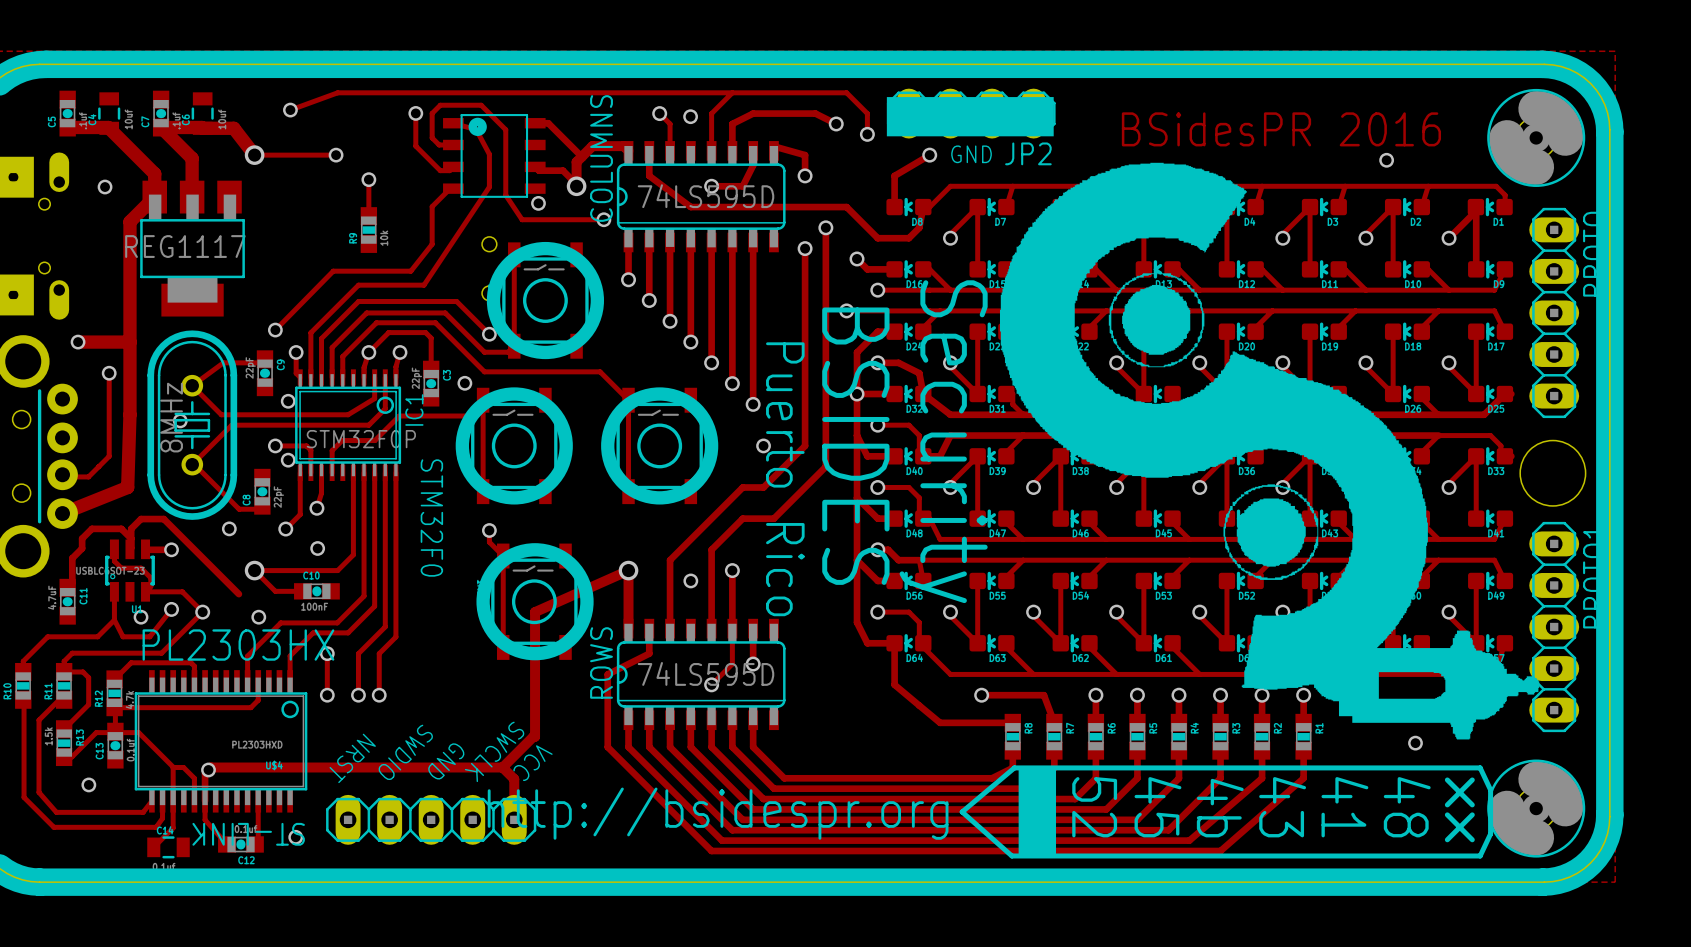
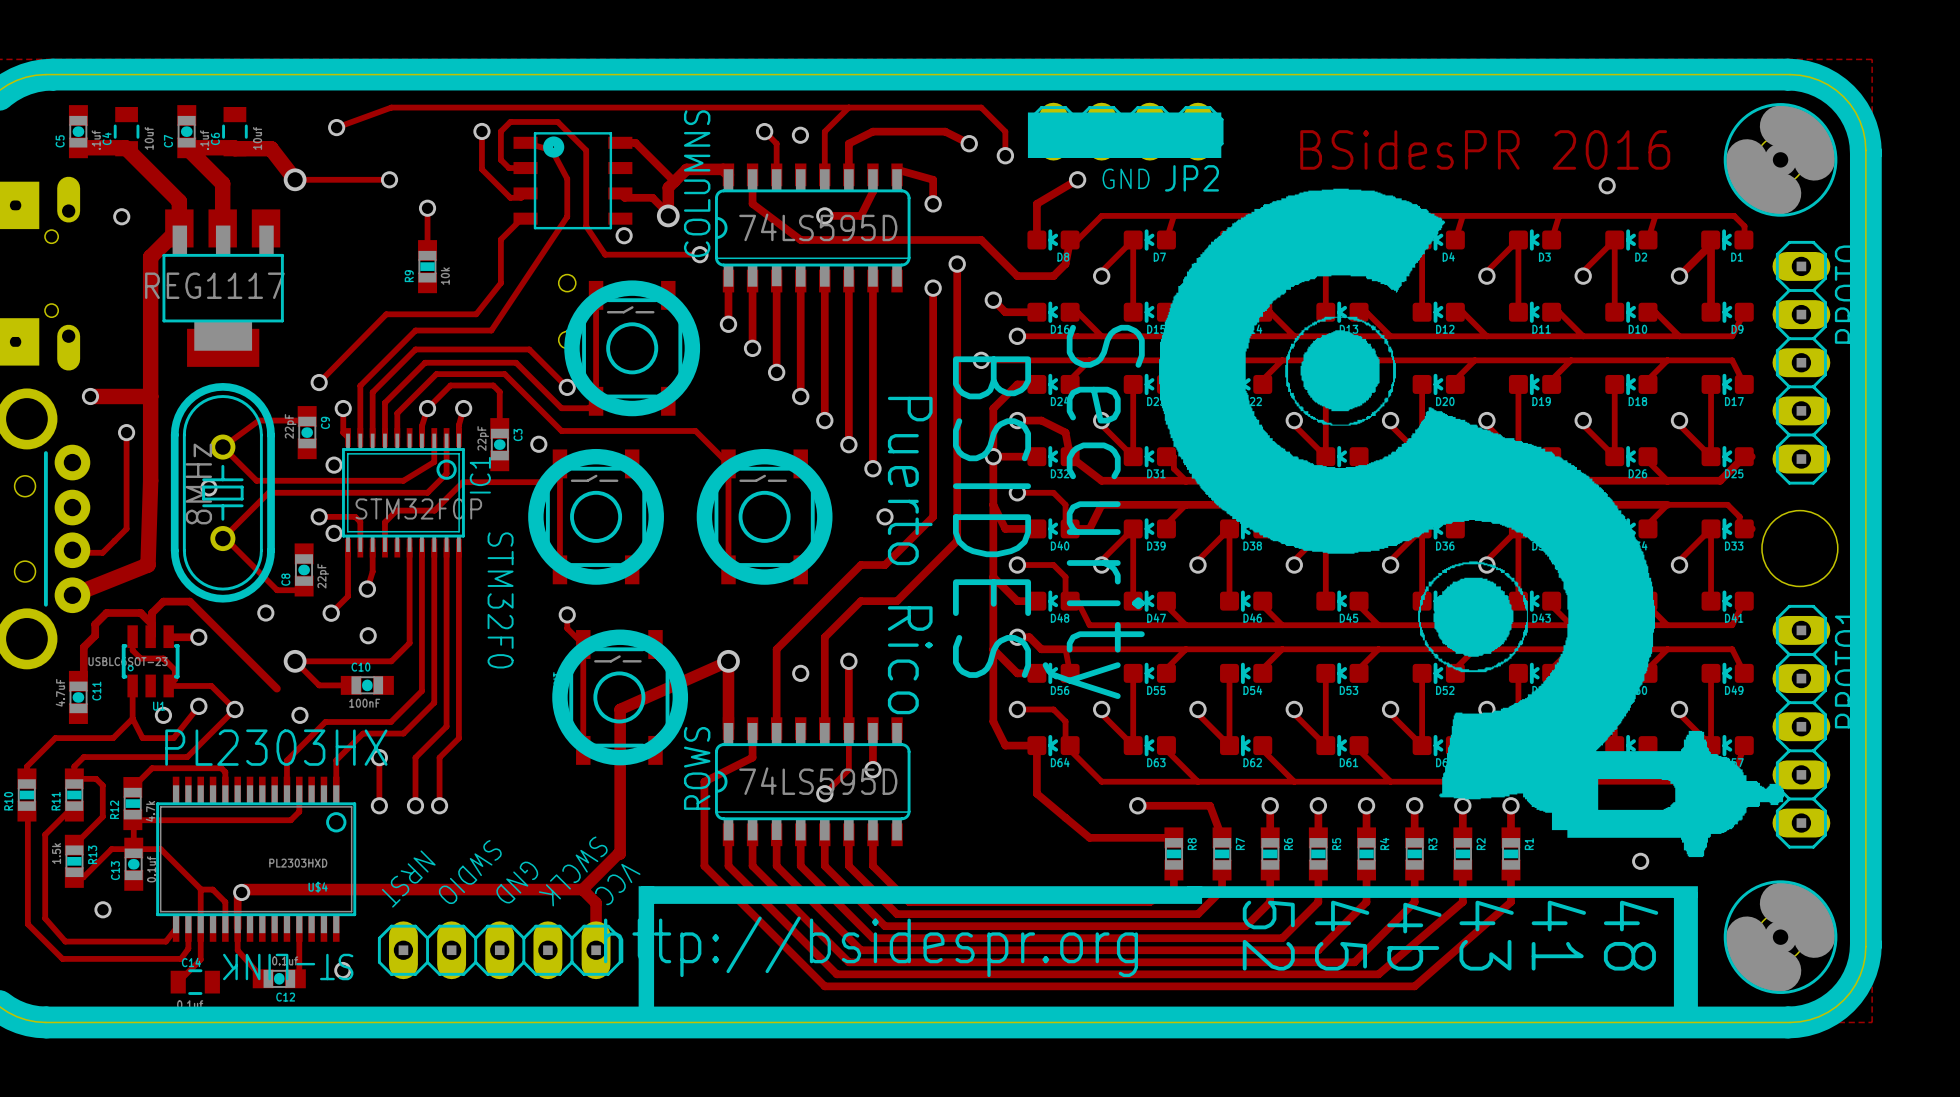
drawing: none -> [638, 886, 1698, 1016]
line: (1014, 767) (962, 811) (1011, 855) (1480, 855) (1490, 833) (1490, 789) (1480, 767) (1014, 767) -> none
drawing: [1018, 769, 1057, 855] -> none
line: (1447, 779) (1472, 804) -> none
line: (1472, 779) (1447, 804) -> none
text position: http://bsidespr.org (718, 813) -> http://bsidespr.org (870, 946)
line: (1447, 814) (1472, 839) -> none
line: (1472, 814) (1447, 839) -> none

